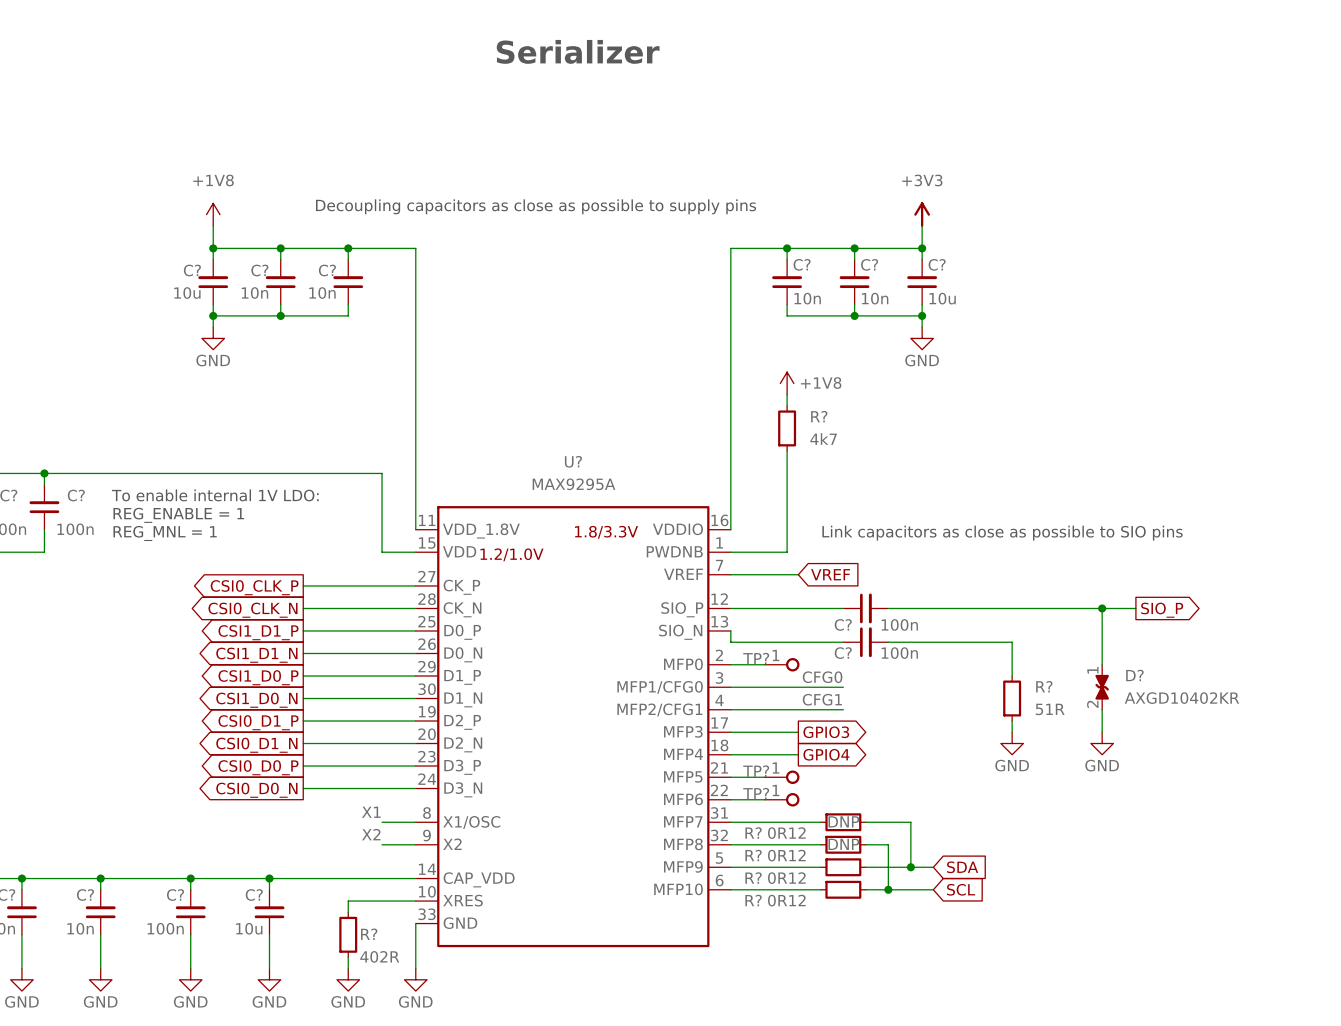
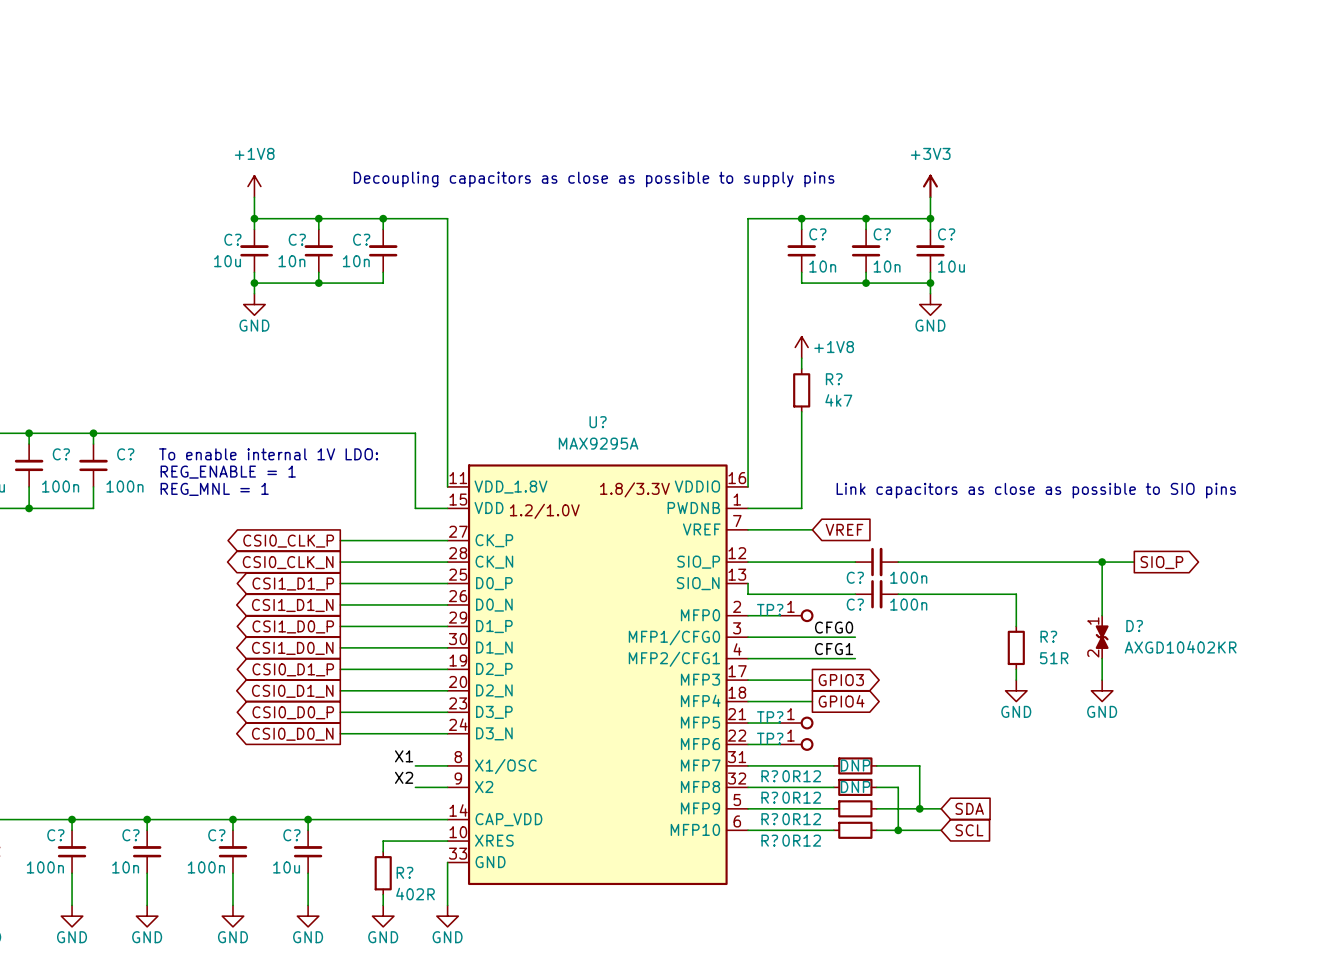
text: Serializer (578, 51) -> none

